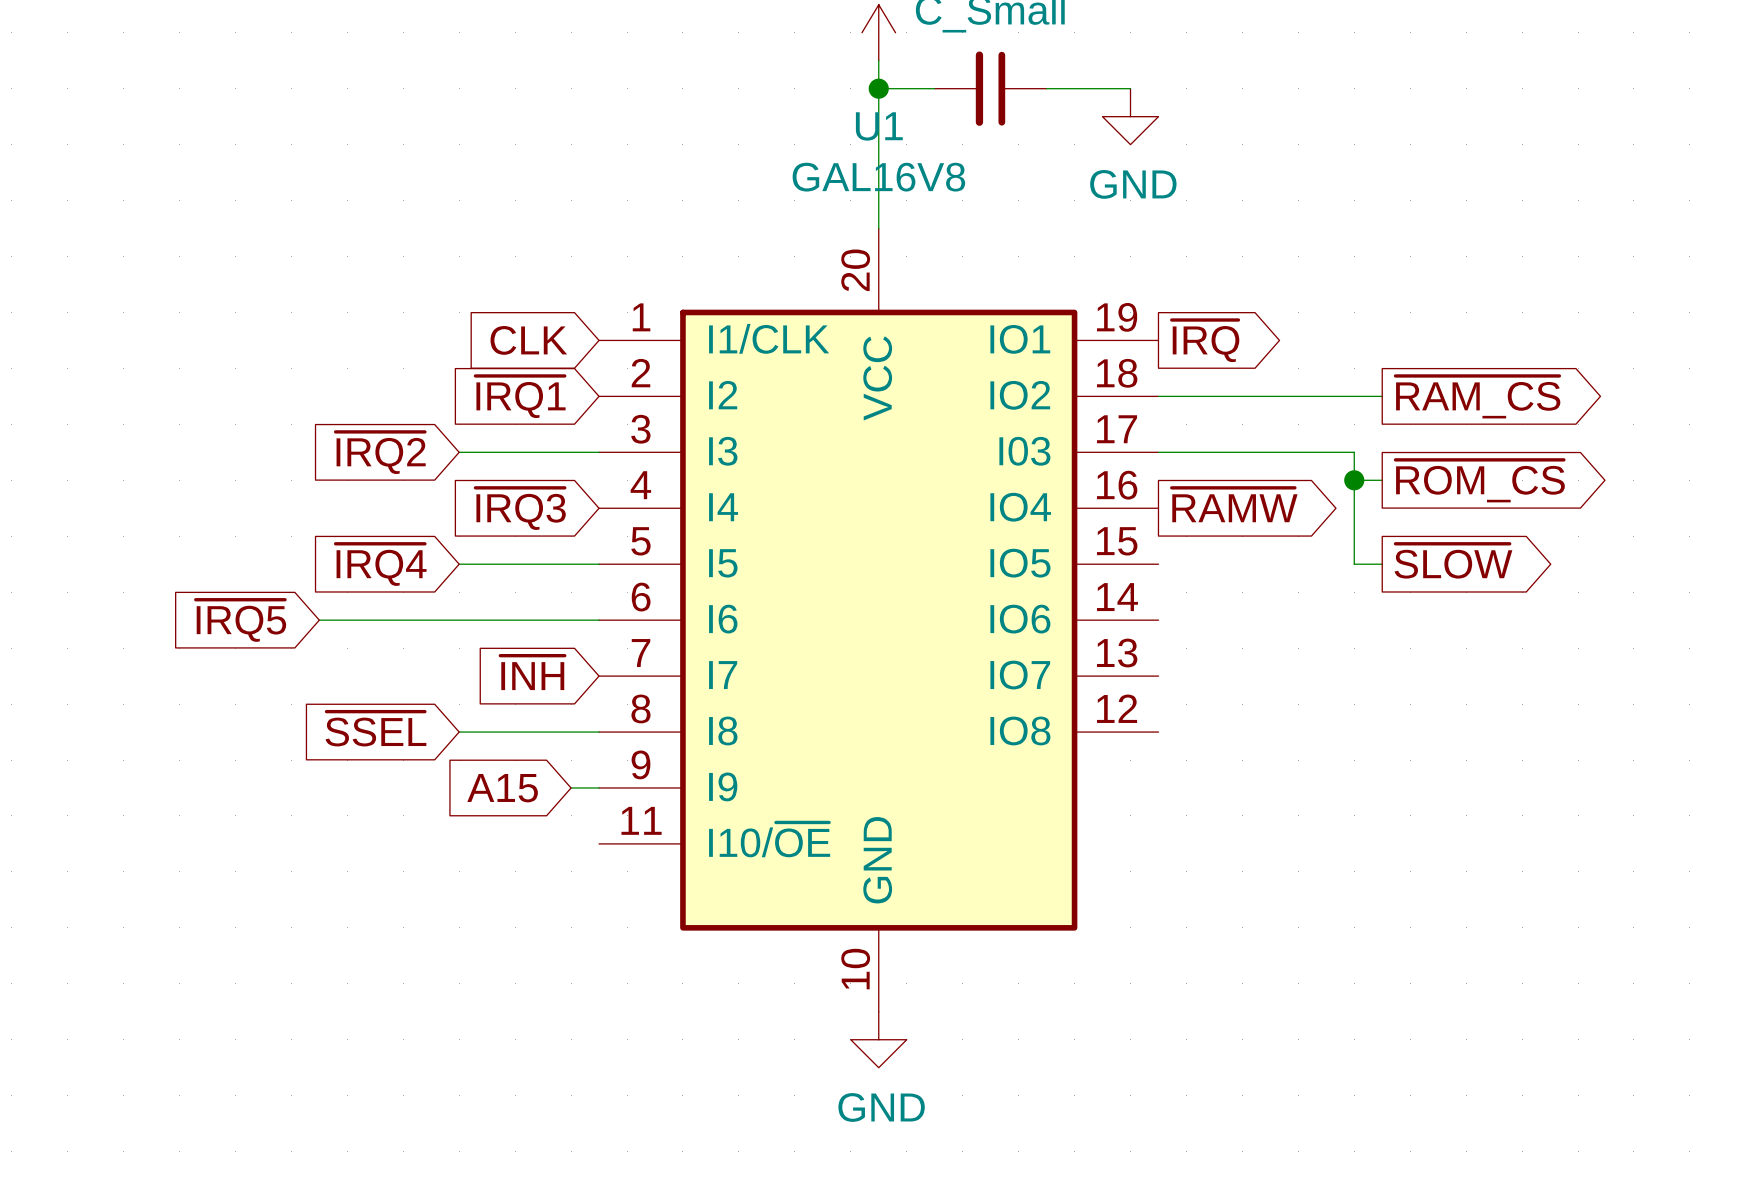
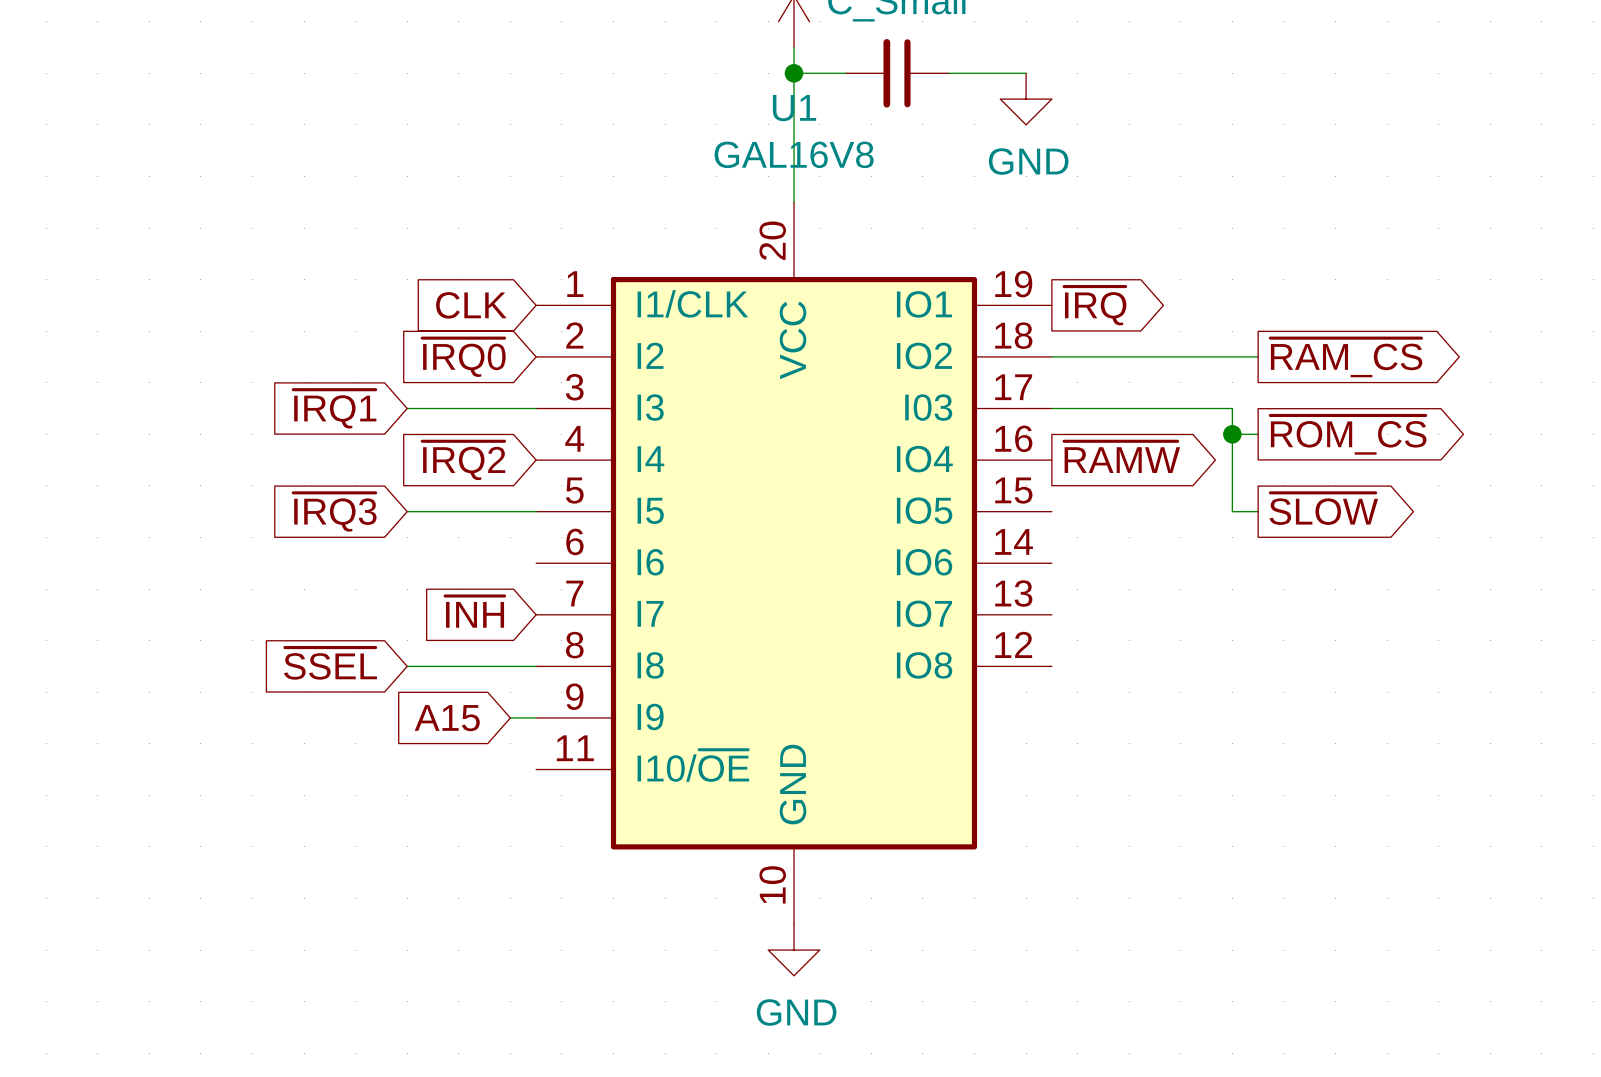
global label: ~{IRQ1} (520, 397) -> ~{IRQ0} (463, 357)
global label: ~{IRQ2} (380, 452) -> ~{IRQ1} (334, 409)
global label: ~{IRQ3} (520, 508) -> ~{IRQ2} (463, 460)
global label: ~{IRQ4} (381, 564) -> ~{IRQ3} (334, 512)
global label: ~{IRQ5} (240, 620) -> none
wire: (319, 620) (599, 620) -> none

